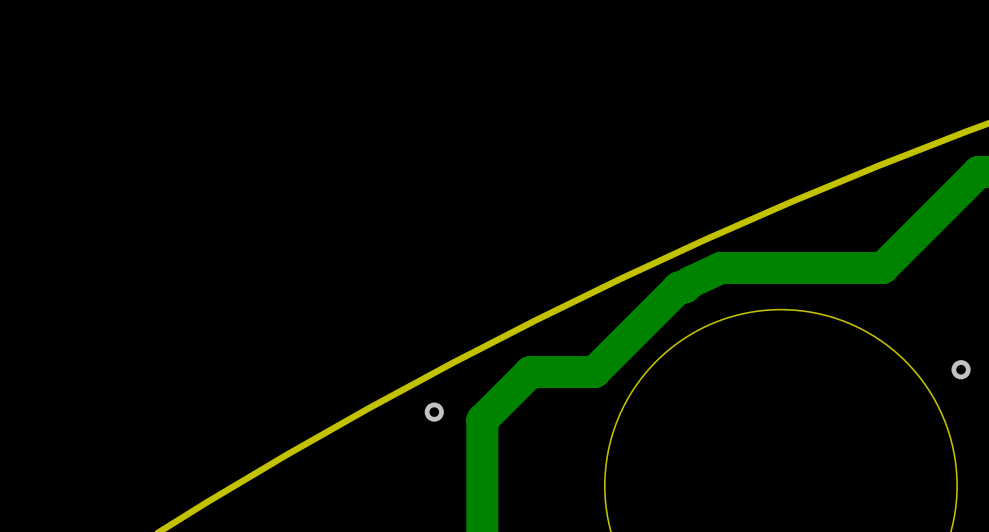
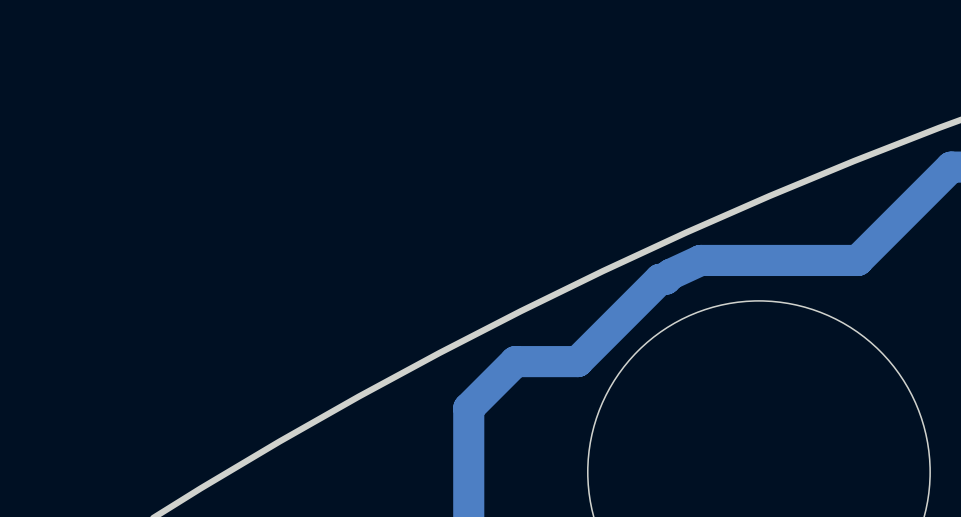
via: (961, 369) -> none
via: (434, 412) -> none

